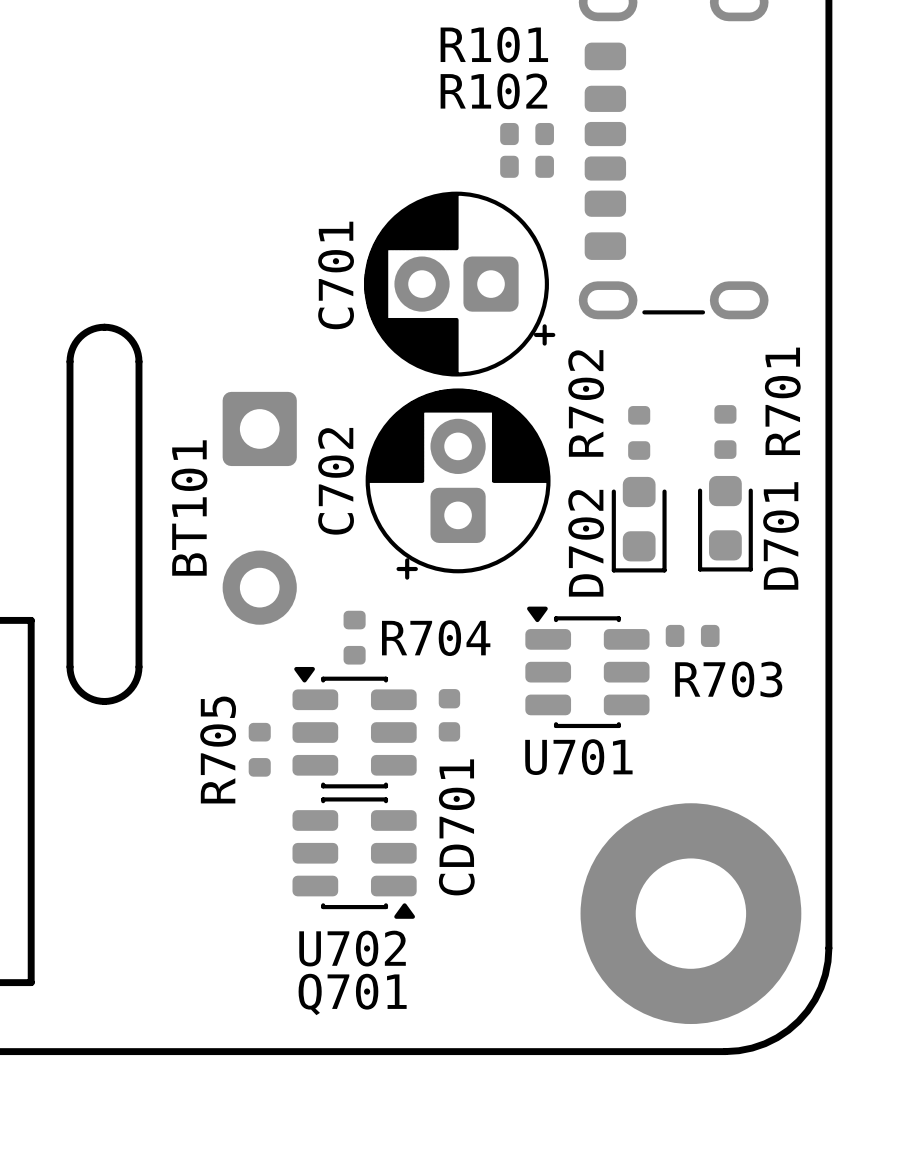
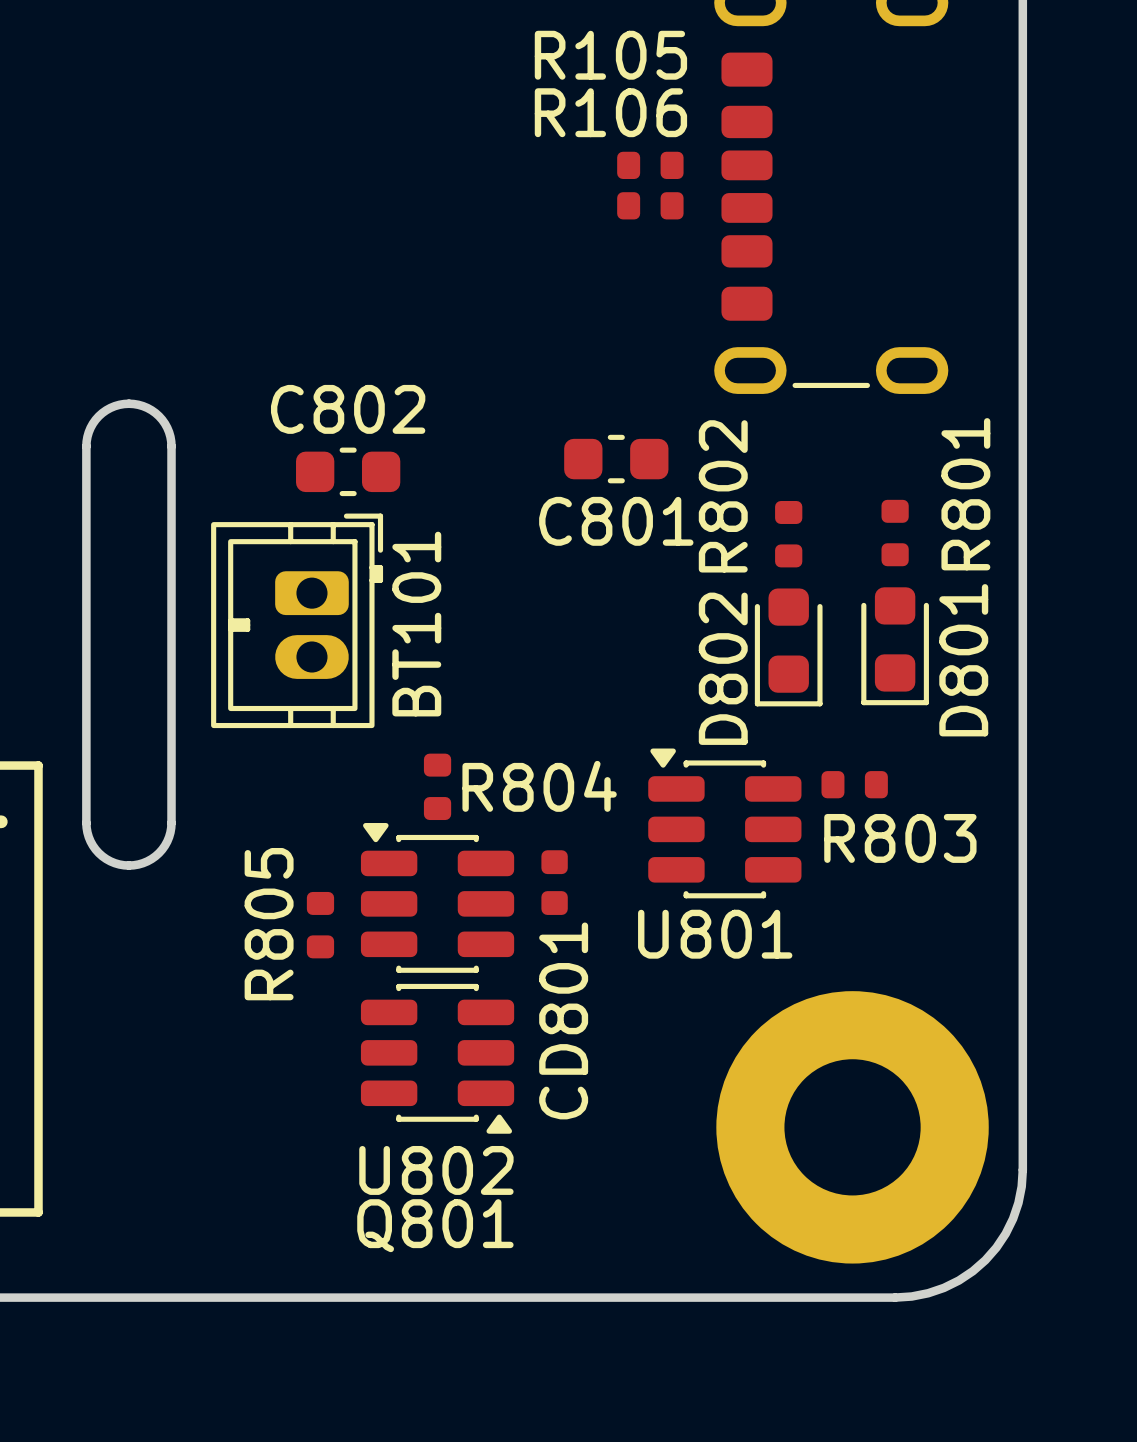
R101 name: R101 (494, 44) -> R105 (610, 55)
R102 name: R102 (493, 91) -> R106 (610, 112)
C701: (459, 284) -> none
C801: none -> (616, 459)
C802: none -> (348, 471)
BT101 footprint: [222, 391, 297, 625] -> [211, 513, 384, 729]
R701 name: R701 (782, 401) -> R801 (965, 494)
R702 name: R702 (586, 403) -> R802 (723, 496)
C702: (458, 484) -> none
BT101 name position: BT101 (189, 507) -> BT101 (416, 624)
D701 name: D701 (781, 535) -> D801 (963, 660)
D702 name: D702 (586, 543) -> D802 (723, 668)
R704 name: R704 (436, 638) -> R804 (539, 786)
R703 name: R703 (728, 679) -> R803 (900, 838)
R705 name: R705 (218, 750) -> R805 (269, 924)
U701 name: U701 (578, 757) -> U801 (715, 934)
CD701 name: CD701 (456, 827) -> CD801 (563, 1020)
U702 name: U702 (352, 948) -> U802 (436, 1170)
Q701 name: Q701 (352, 994) -> Q801 (435, 1225)

